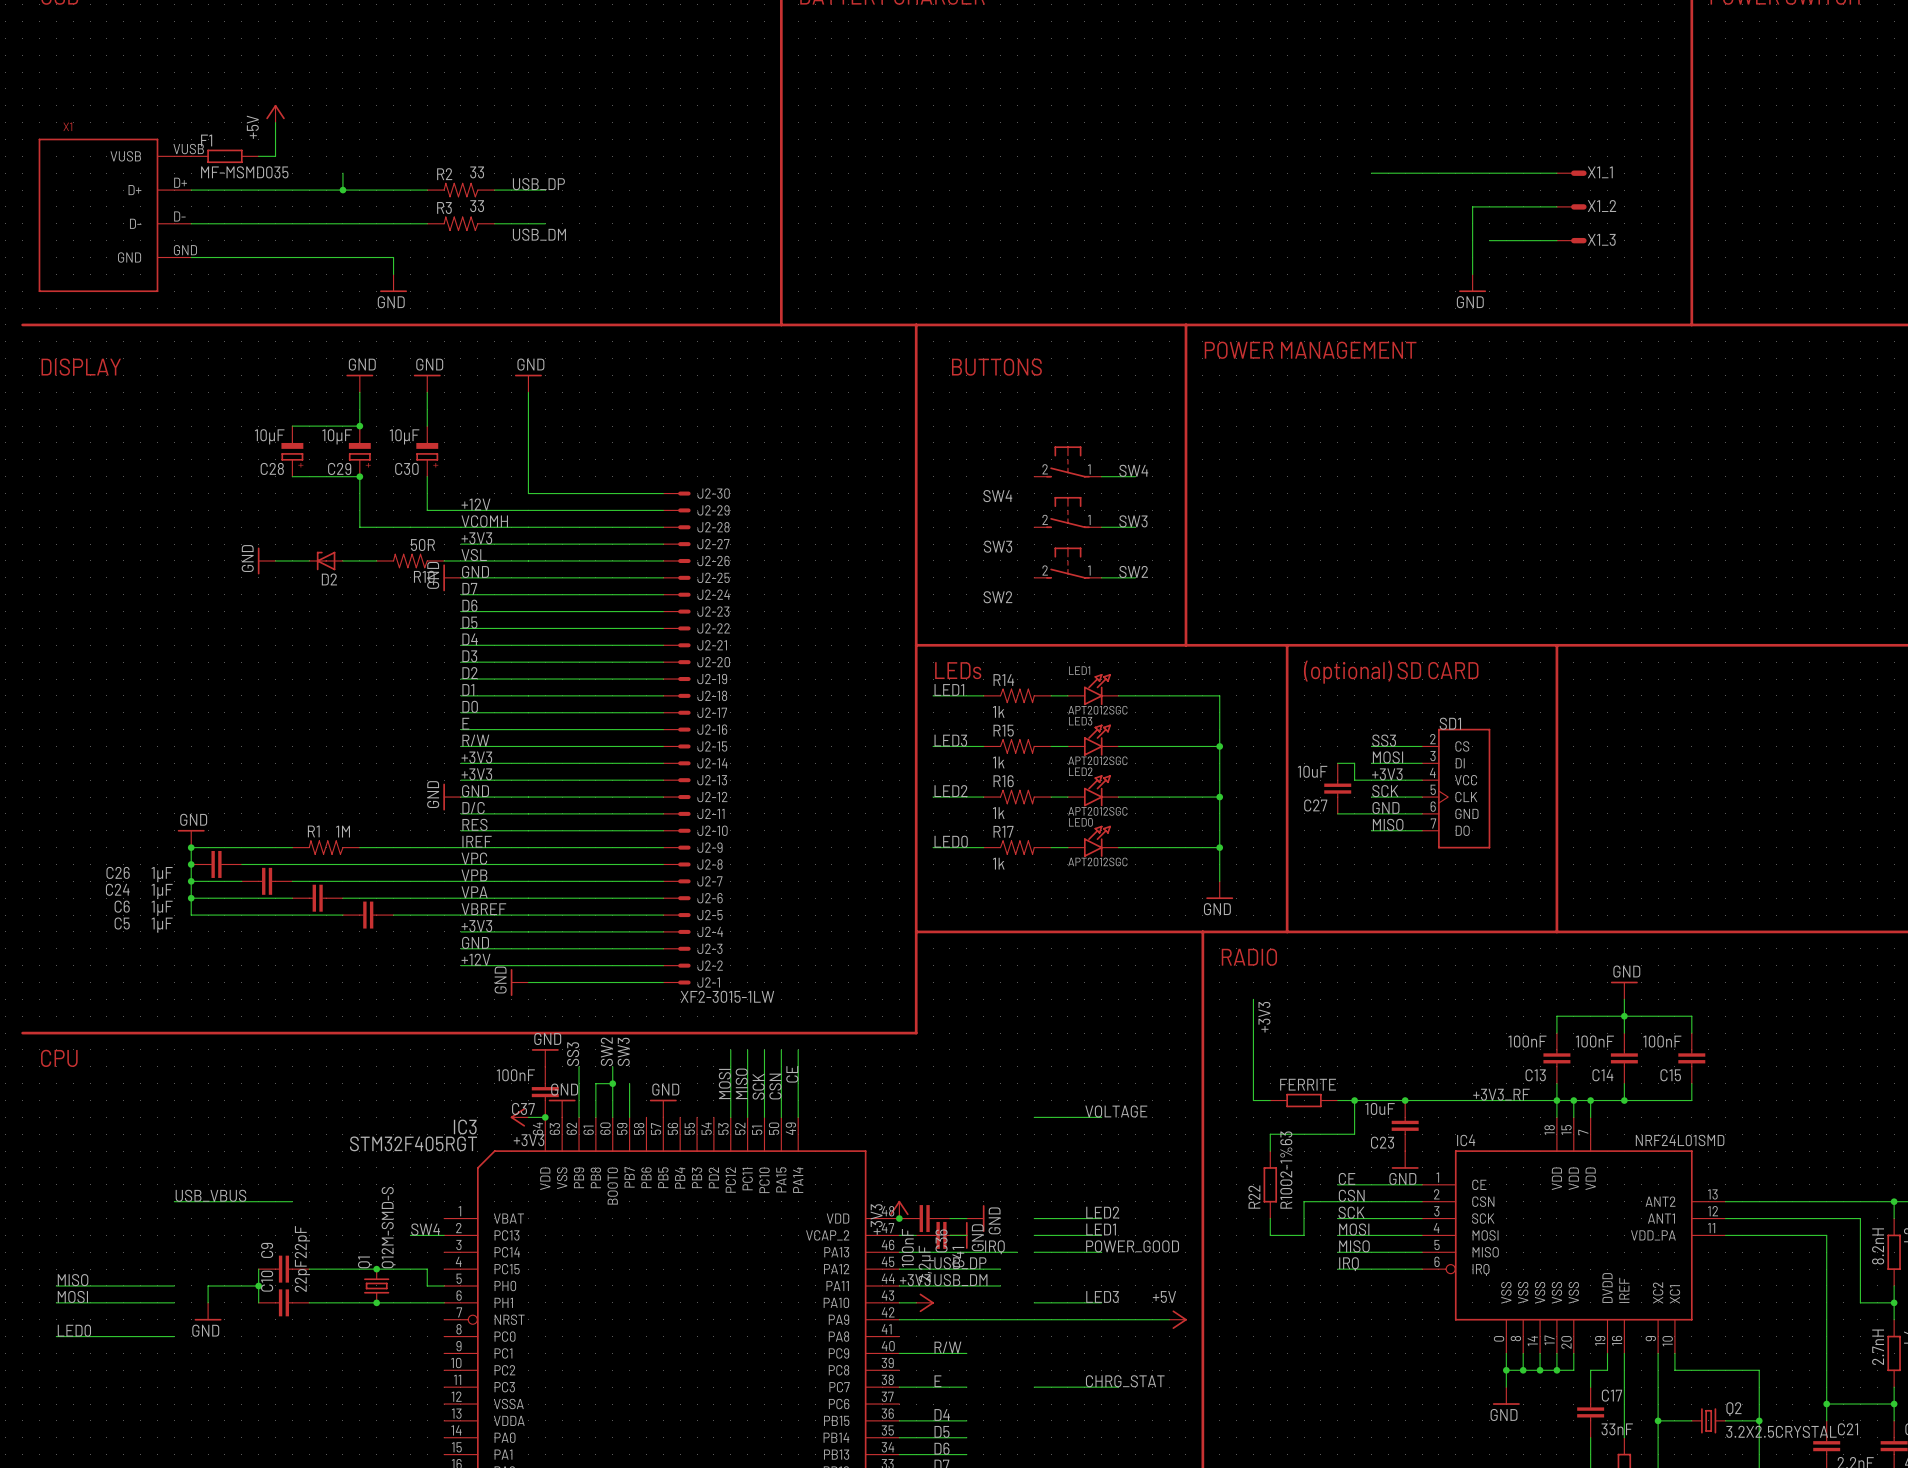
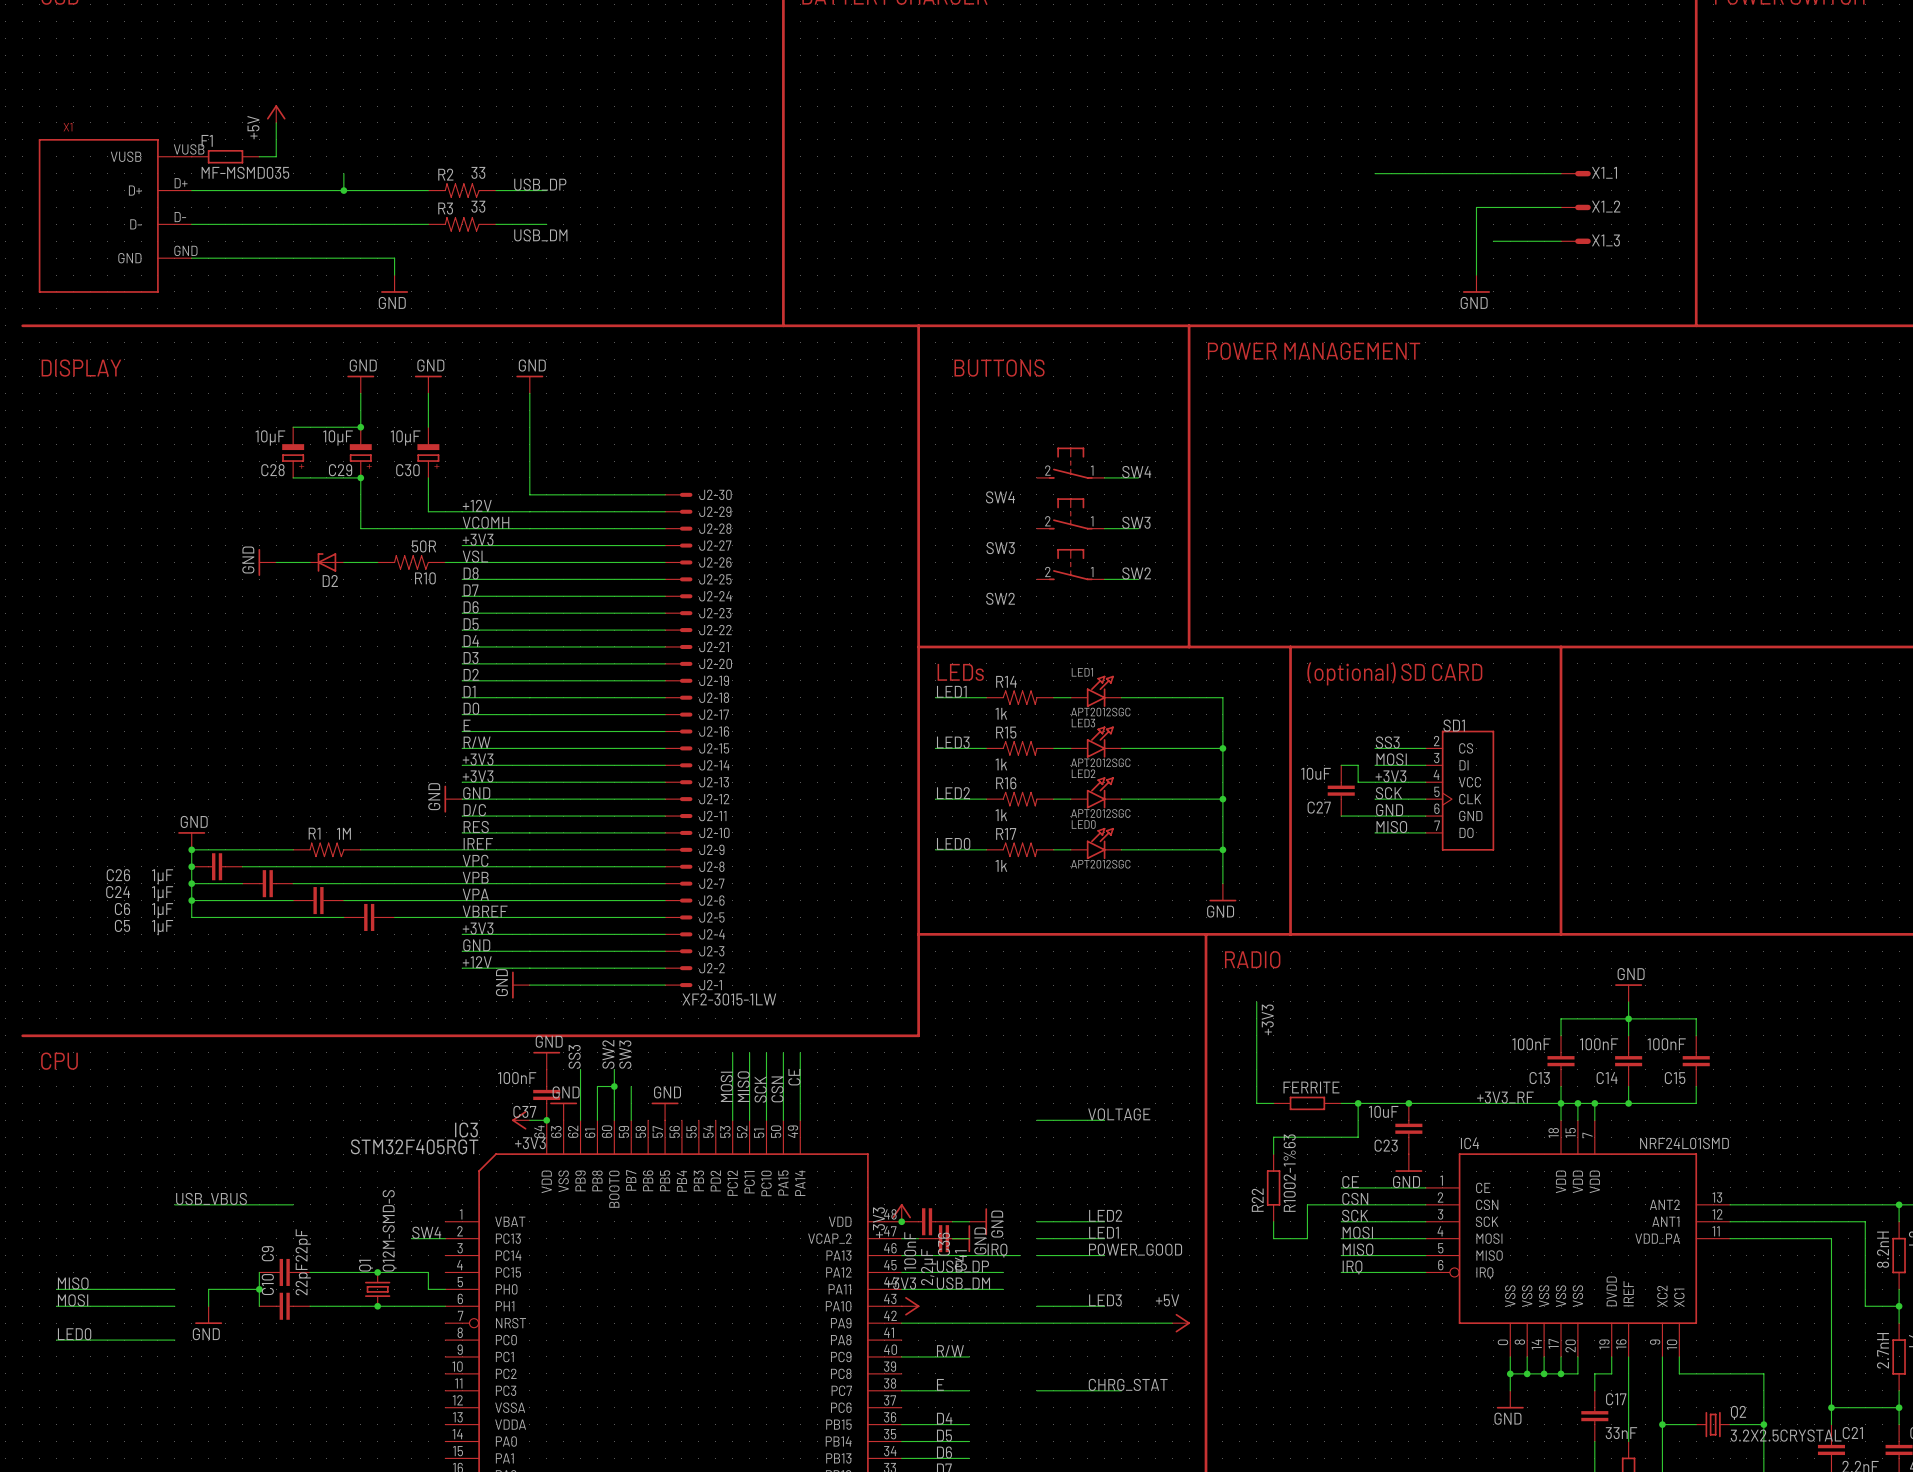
label: GND (475, 571) -> D8 (471, 573)
power symbol: GND (452, 577) -> none
power symbol position: +3V3 (925, 1302) -> +3V3 (910, 1306)

